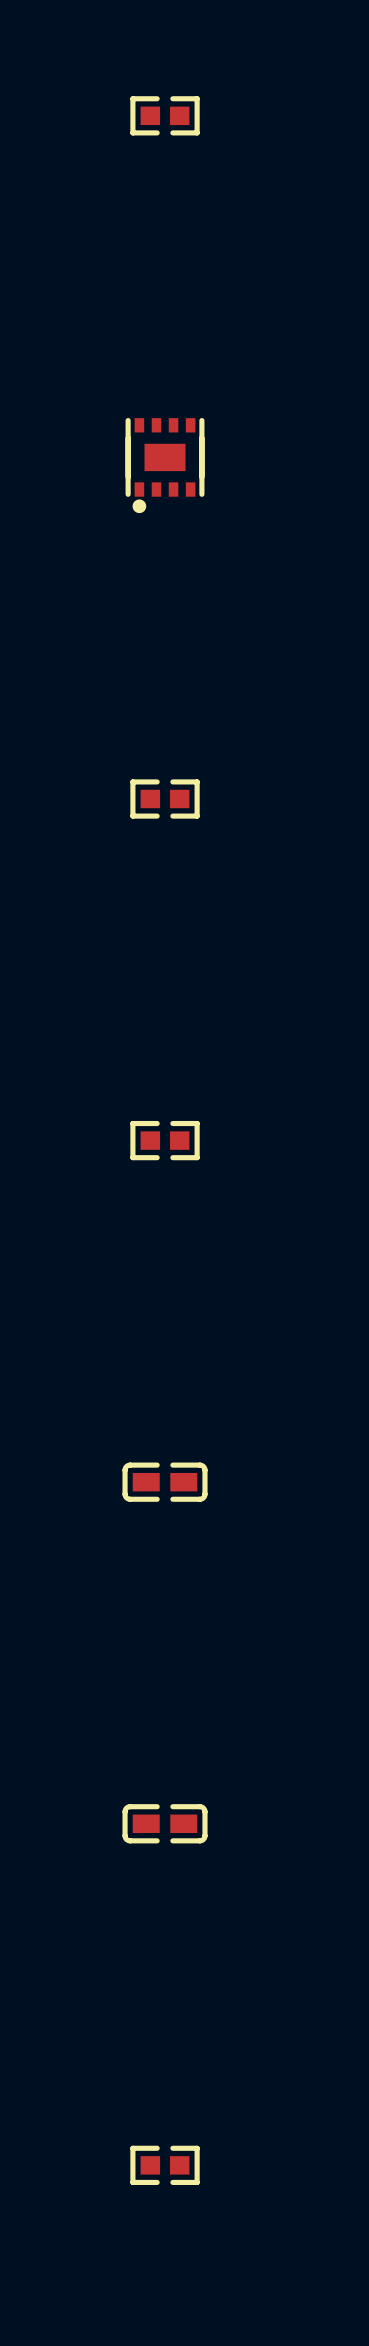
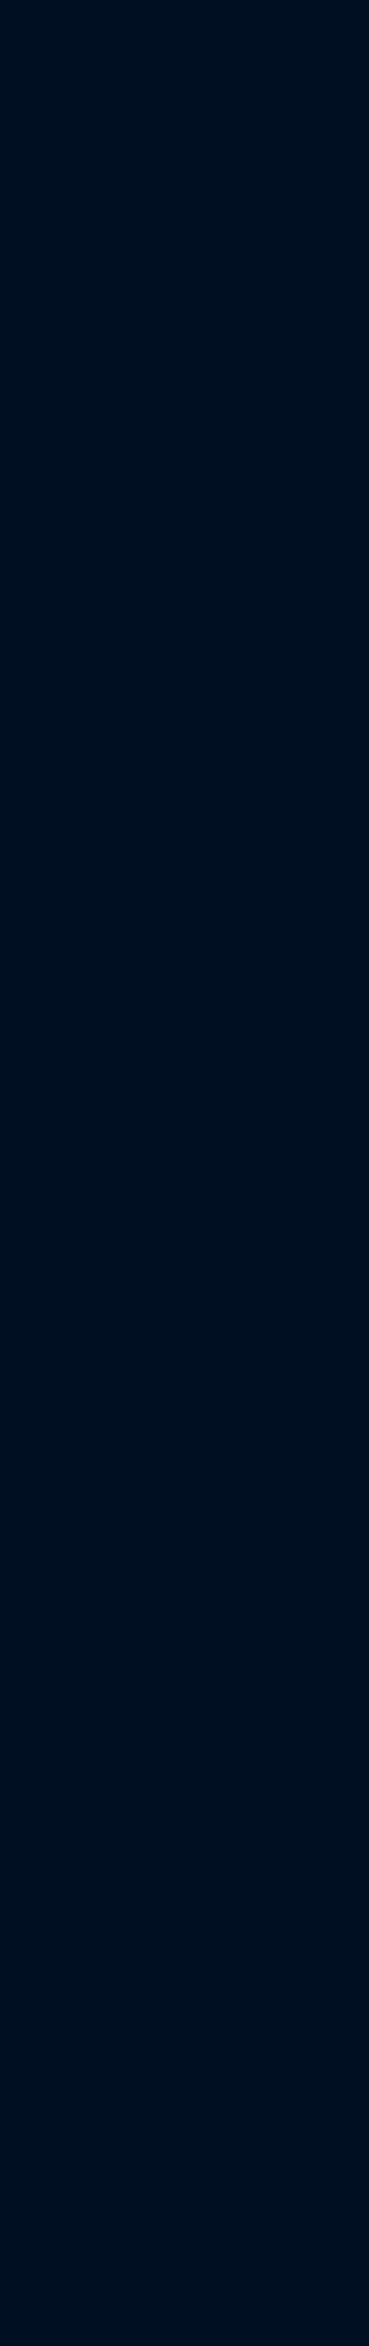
part: (165, 115) -> none
part: (165, 465) -> none
part: (165, 799) -> none
part: (165, 1140) -> none
part: (165, 1482) -> none
part: (165, 1823) -> none
part: (165, 2165) -> none

